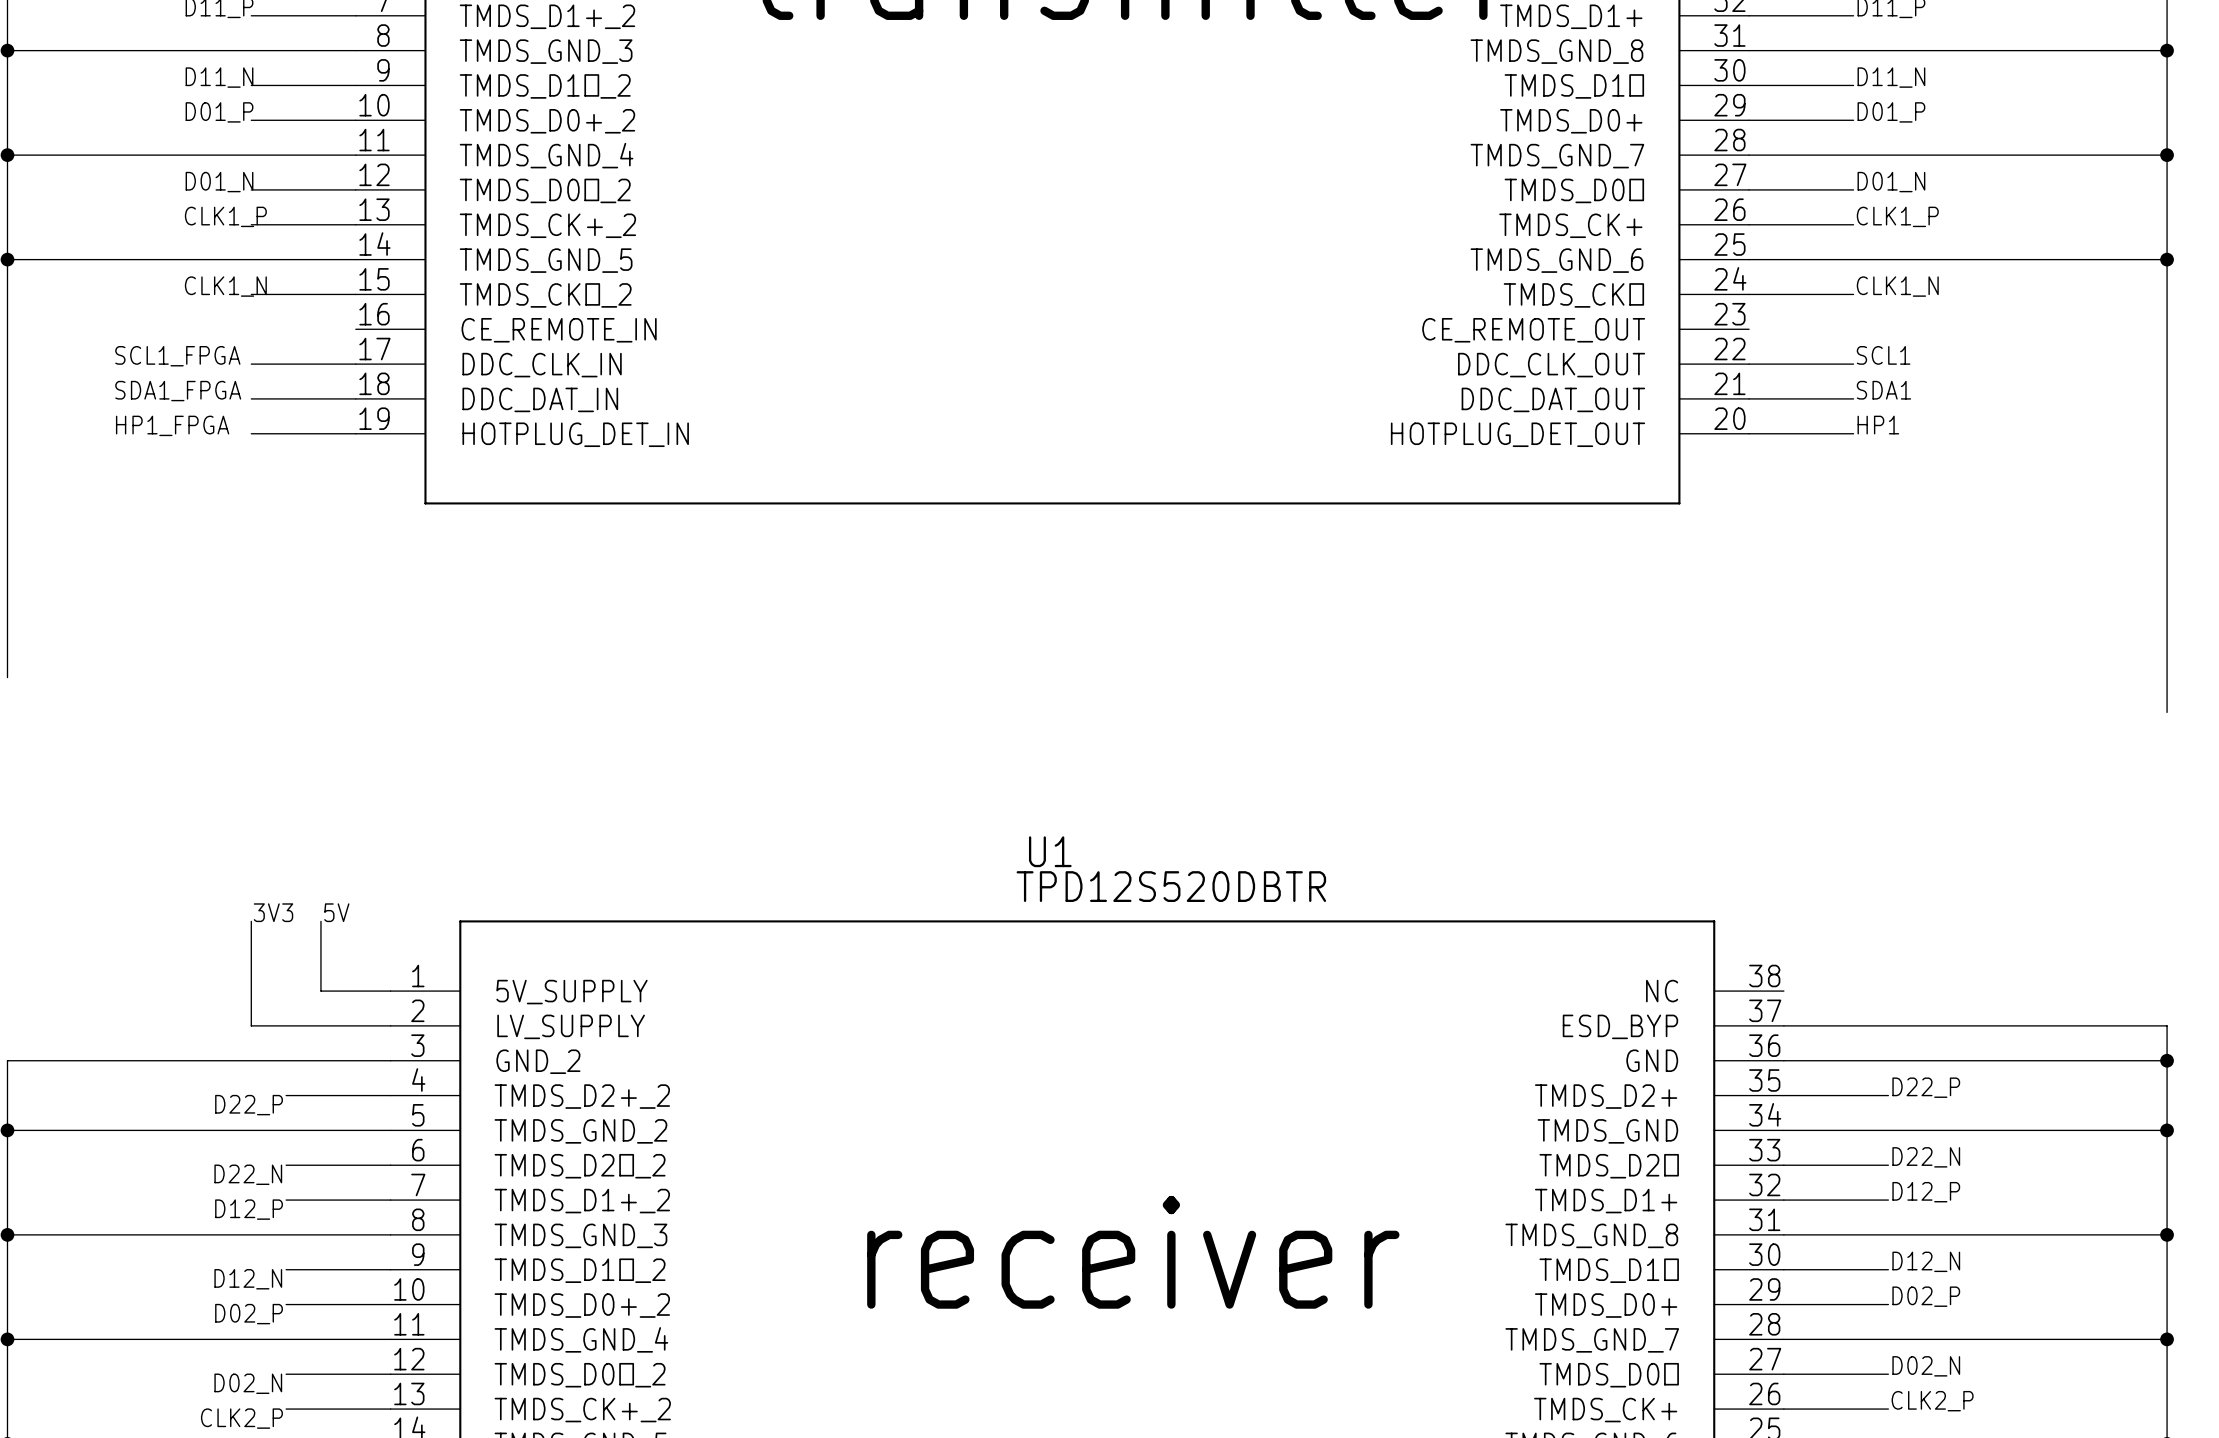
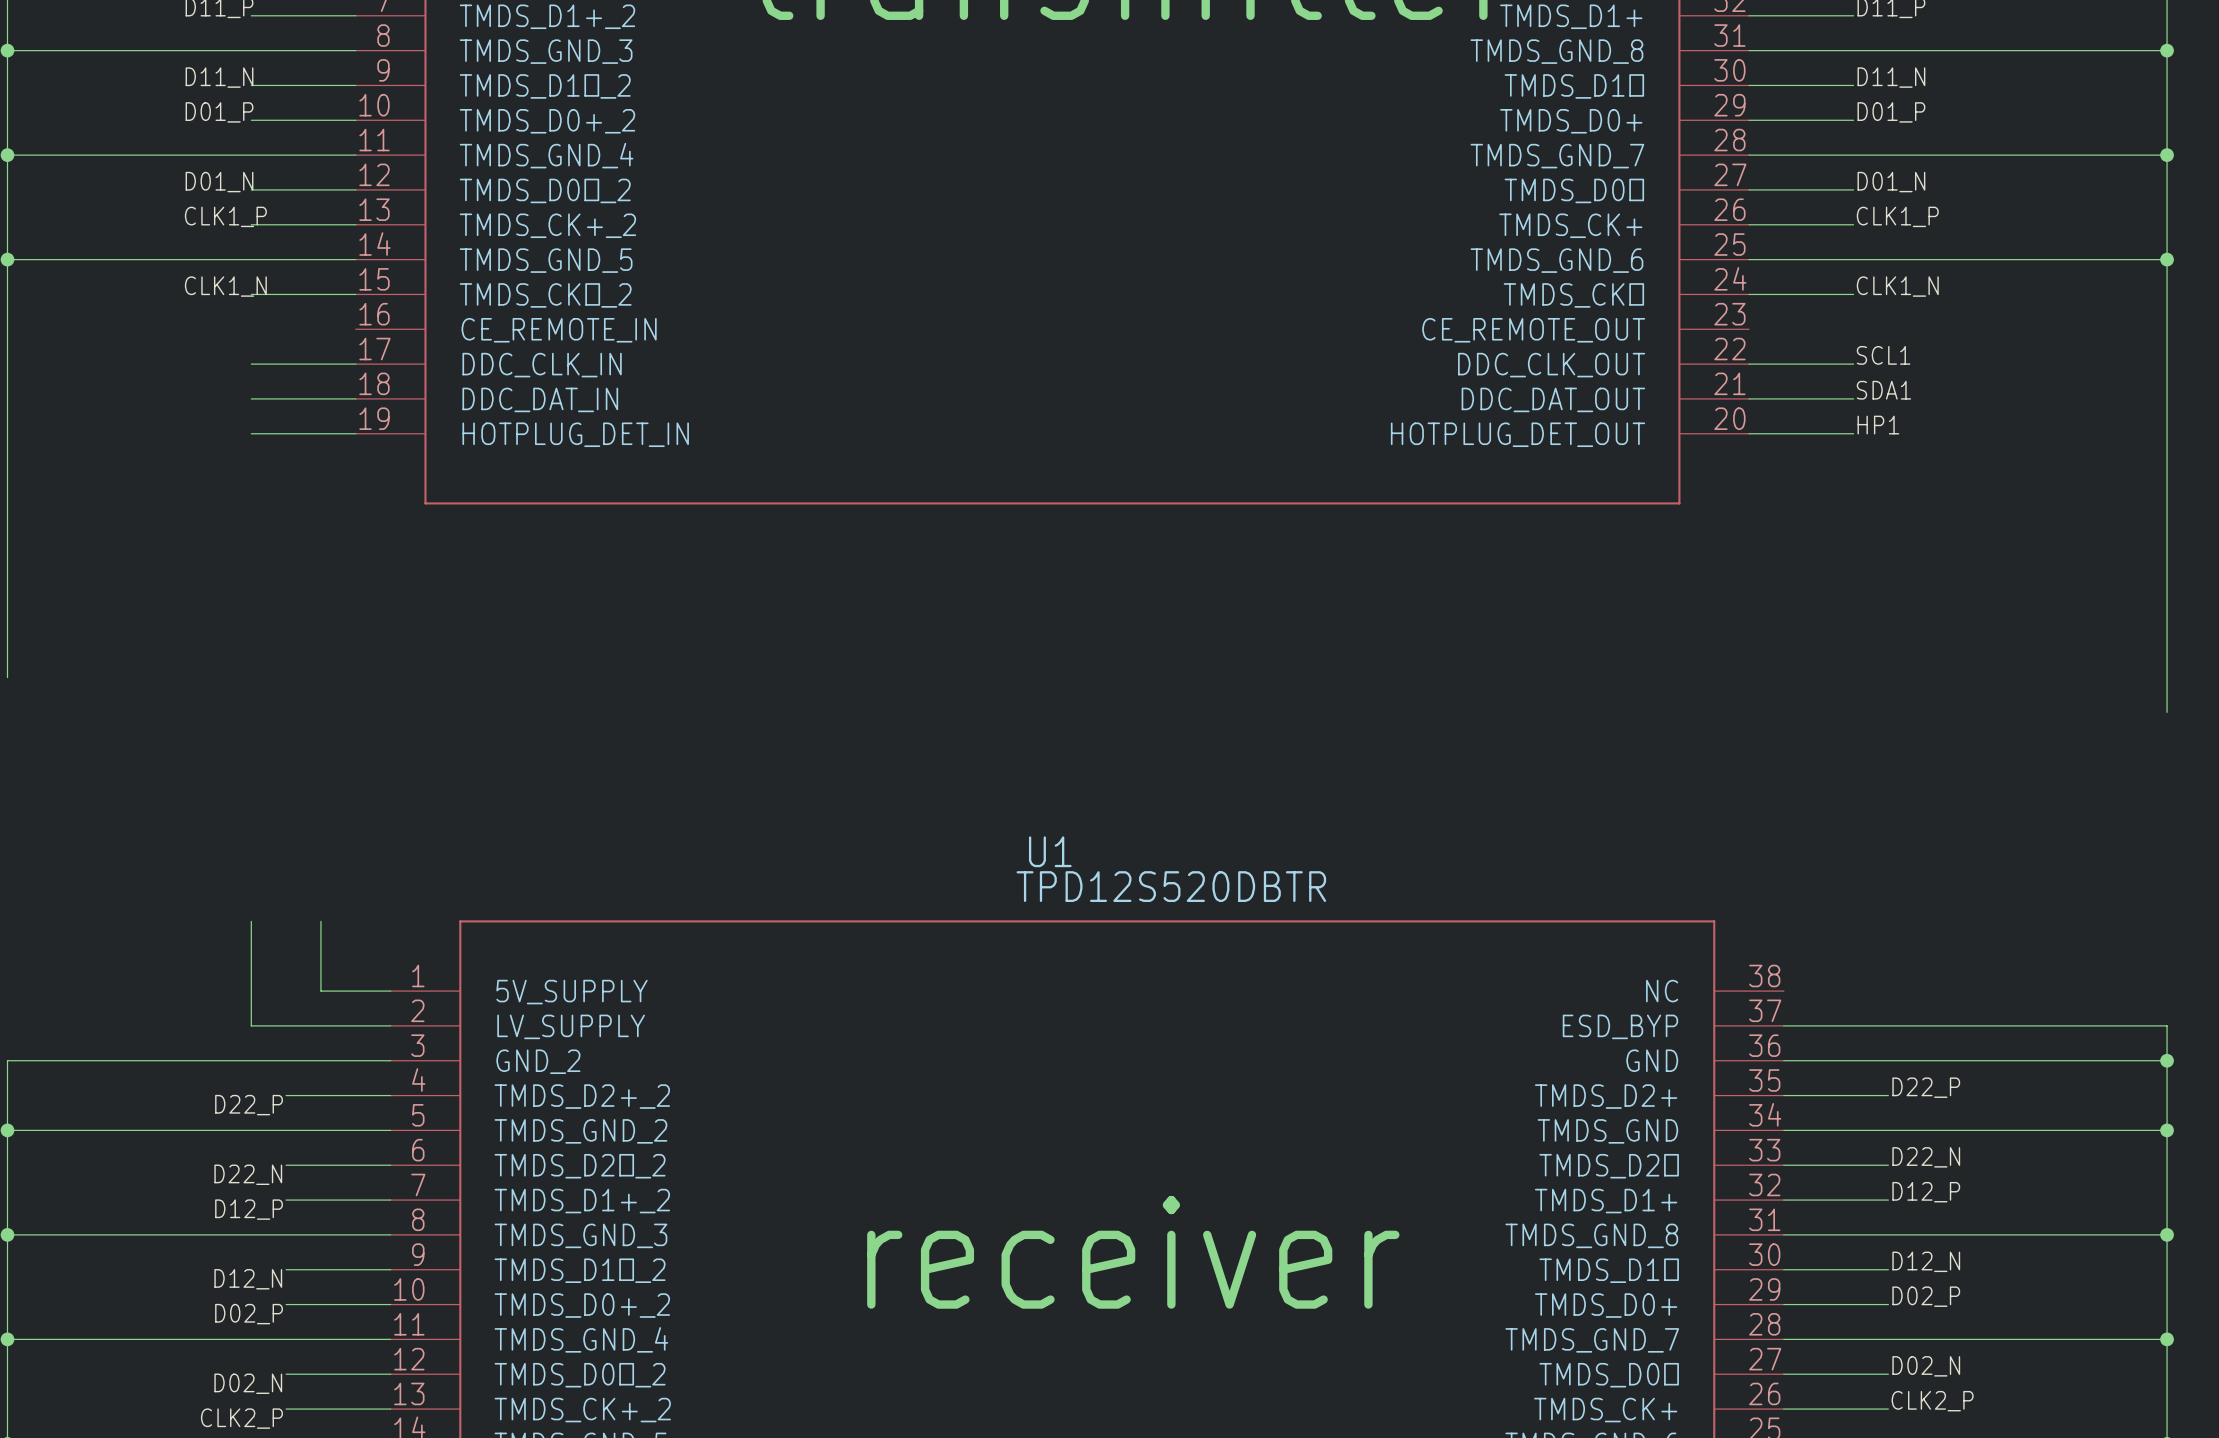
label: SCL1_FPGA (177, 356) -> none
label: SDA1_FPGA (178, 391) -> none
label: HP1_FPGA (172, 425) -> none
label: 3V3 (273, 912) -> none
label: 5V (336, 912) -> none

